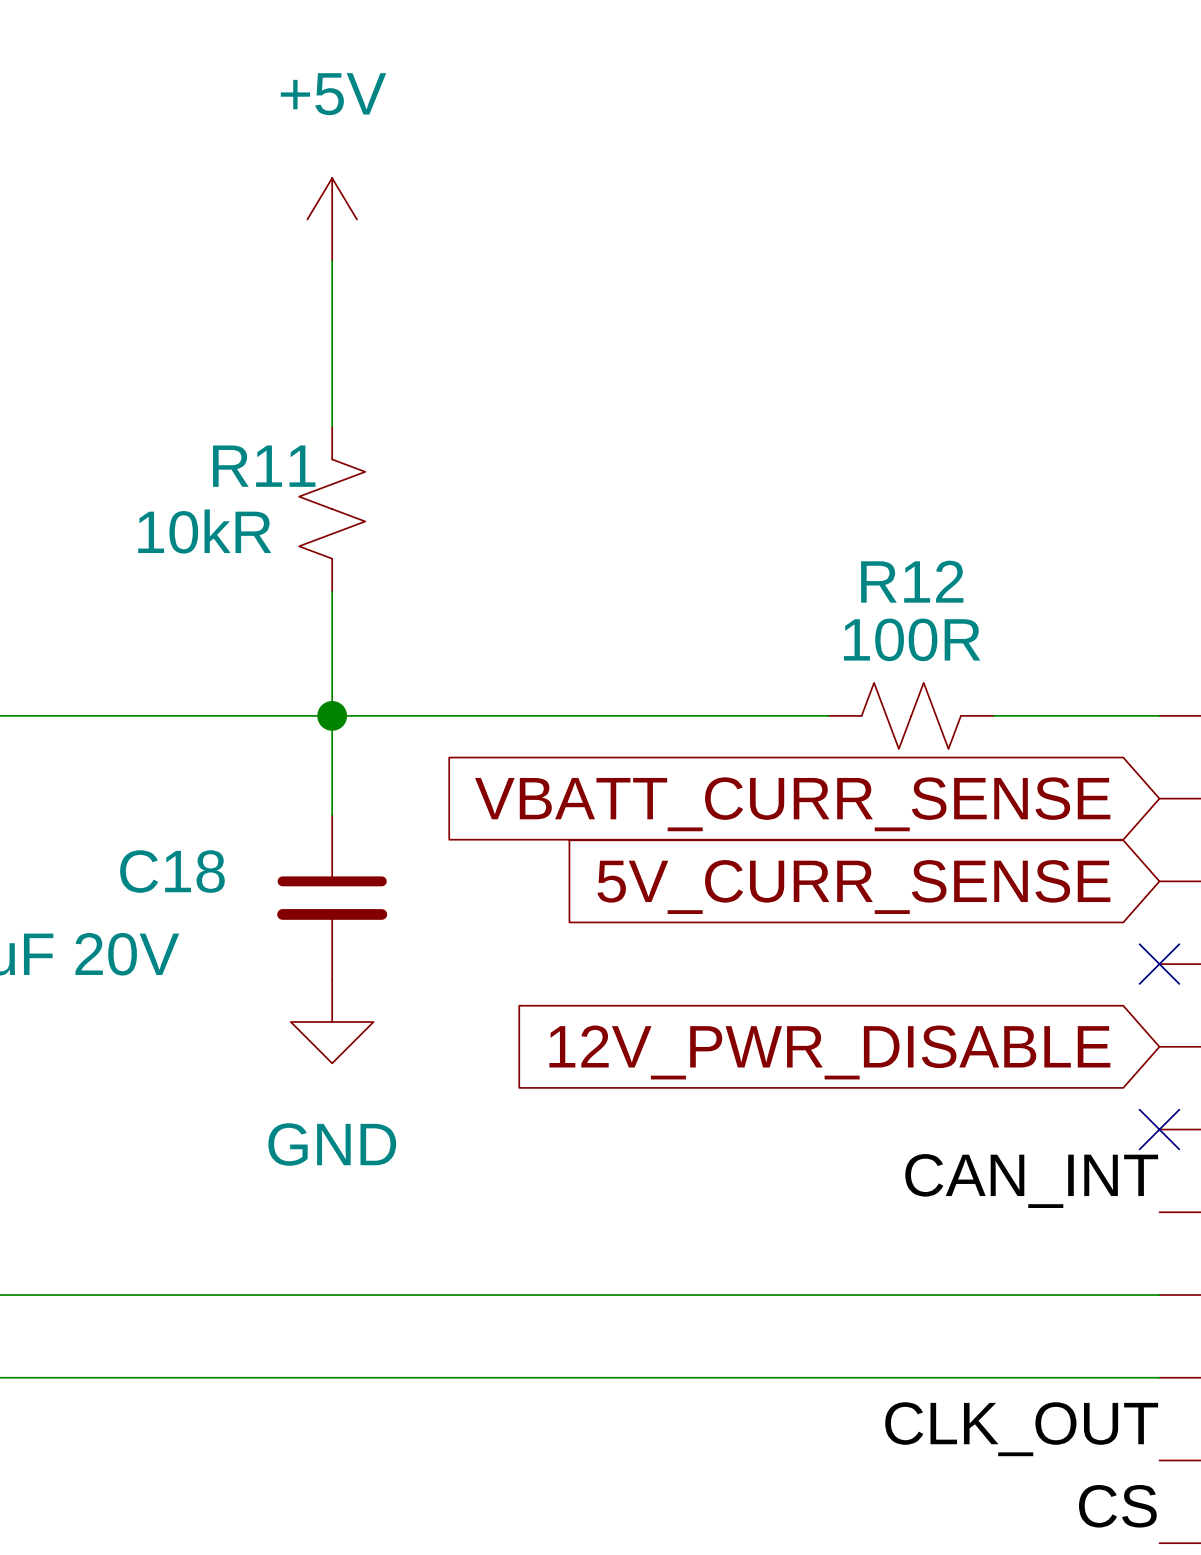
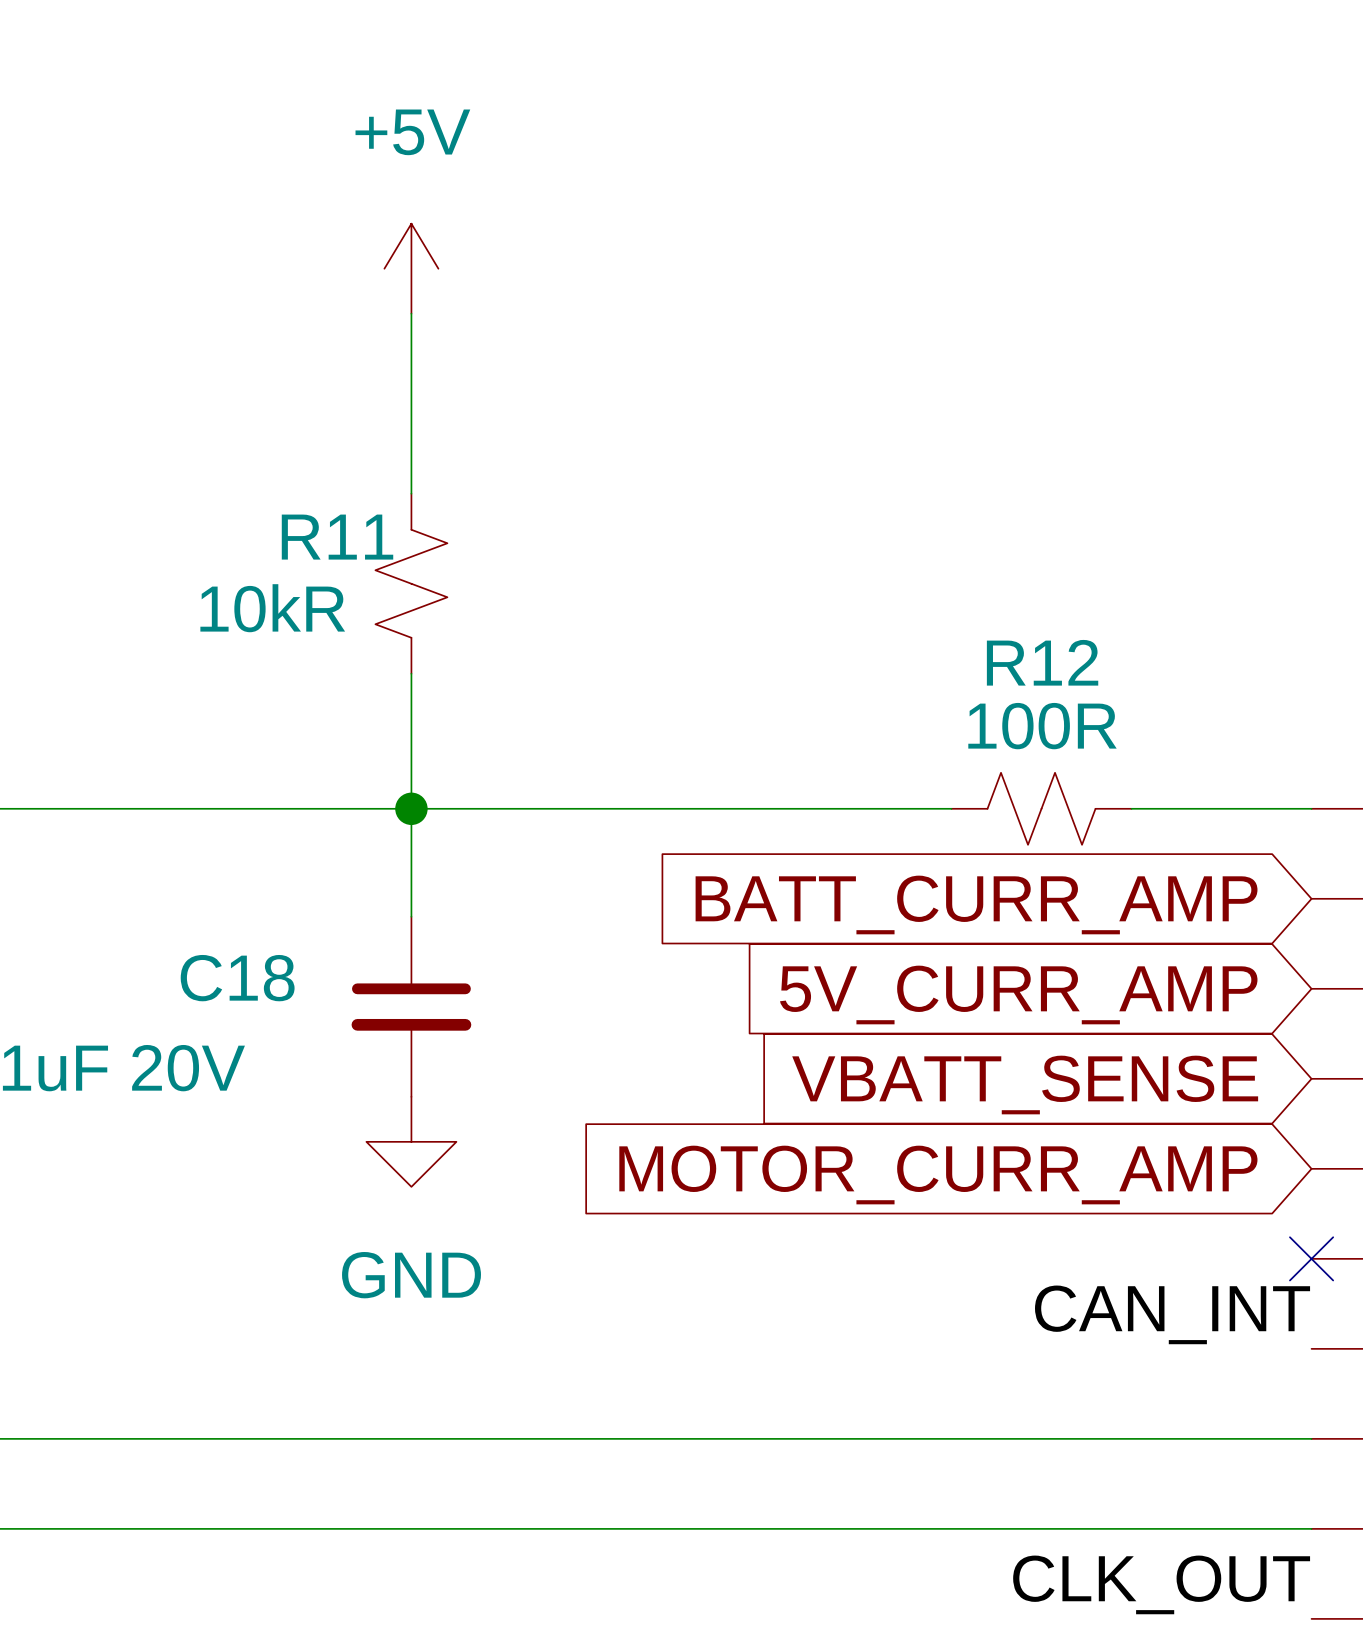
global label: VBATT_CURR_SENSE (792, 804) -> BATT_CURR_AMP (976, 904)
global label: 5V_CURR_SENSE (853, 887) -> 5V_CURR_AMP (1018, 994)
no-connect mark: (1159, 964) -> none
global label: none -> VBATT_SENSE (1025, 1085)
global label: 12V_PWR_DISABLE (829, 1052) -> MOTOR_CURR_AMP (938, 1175)

